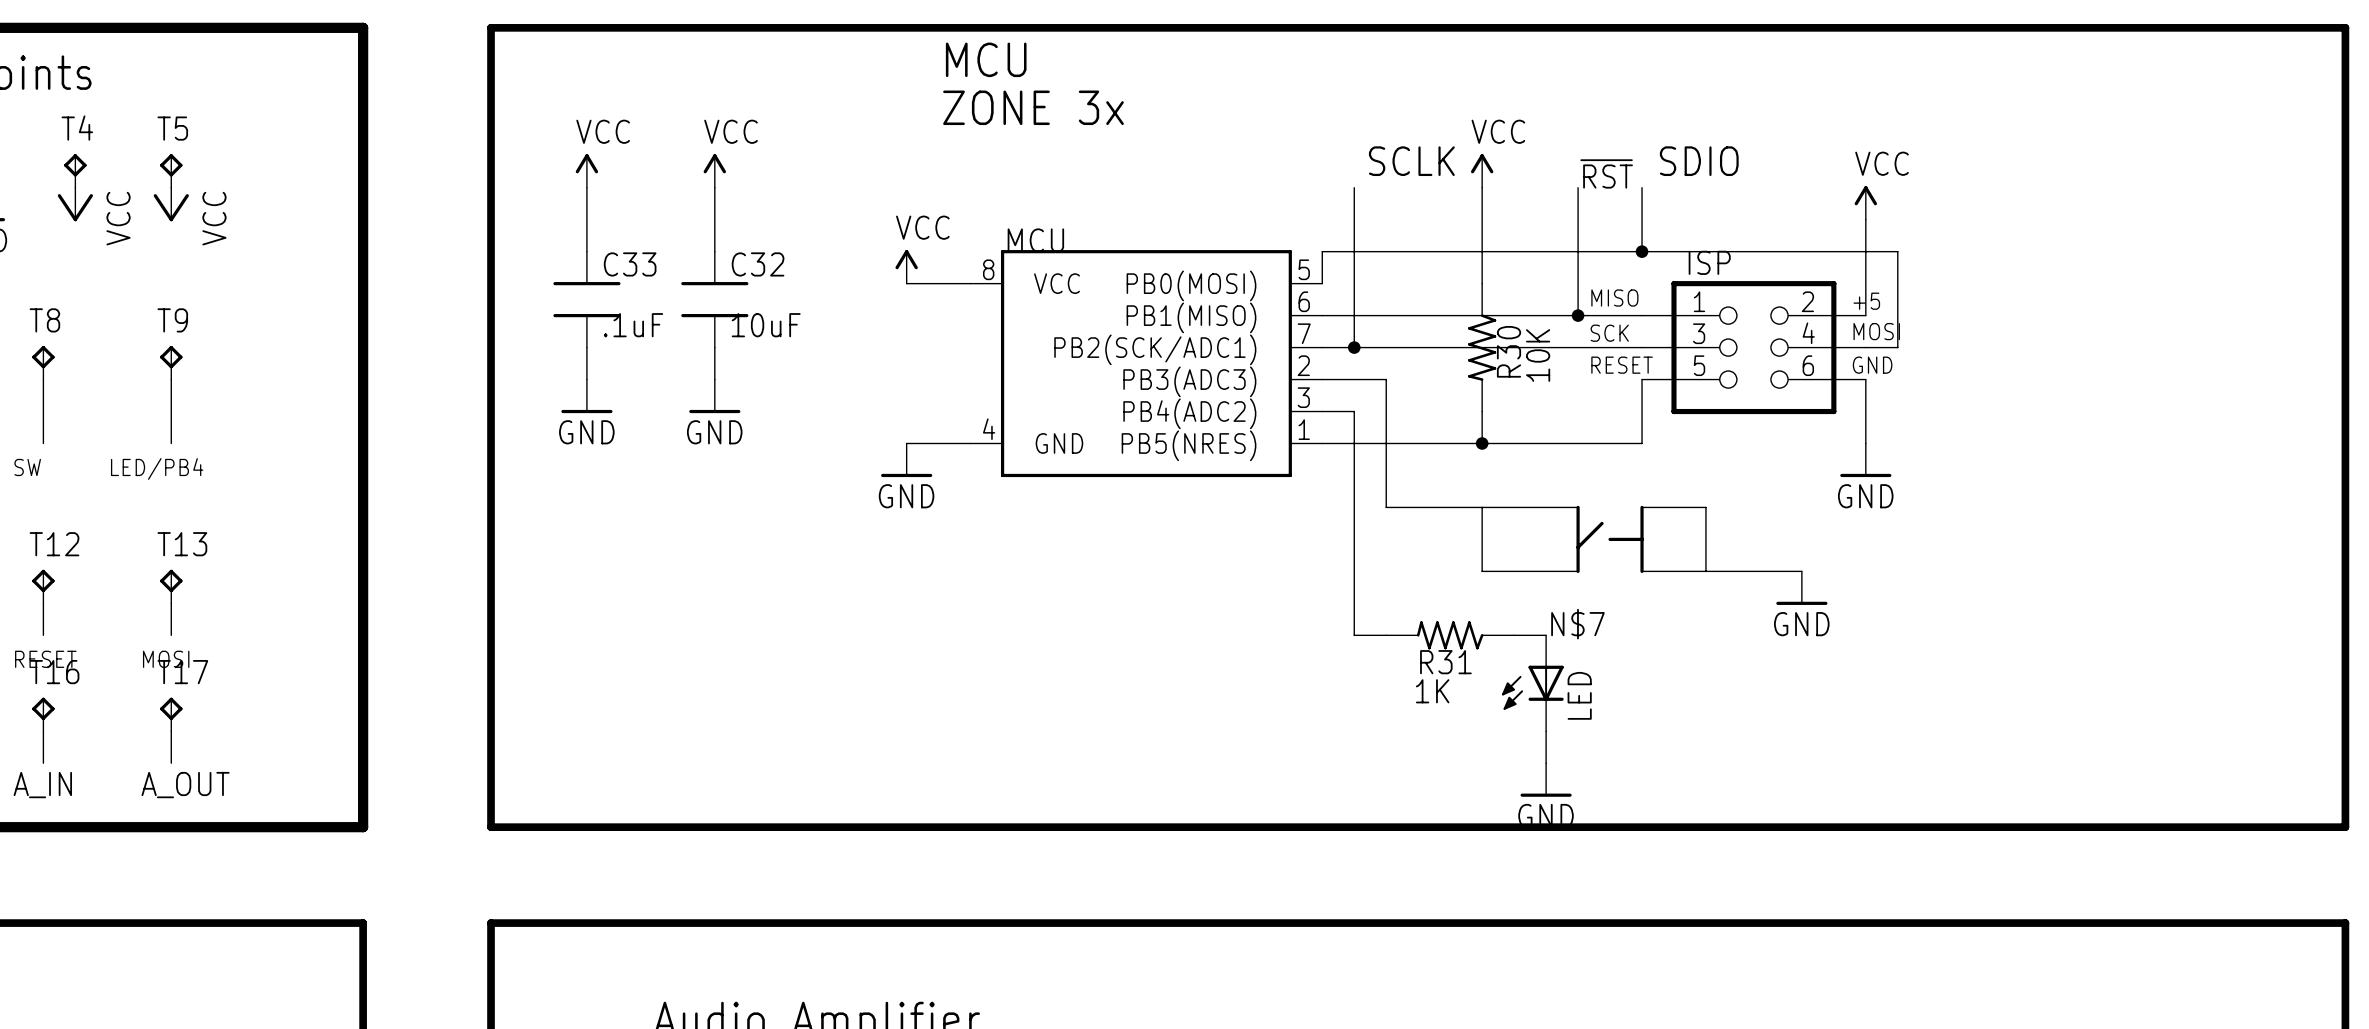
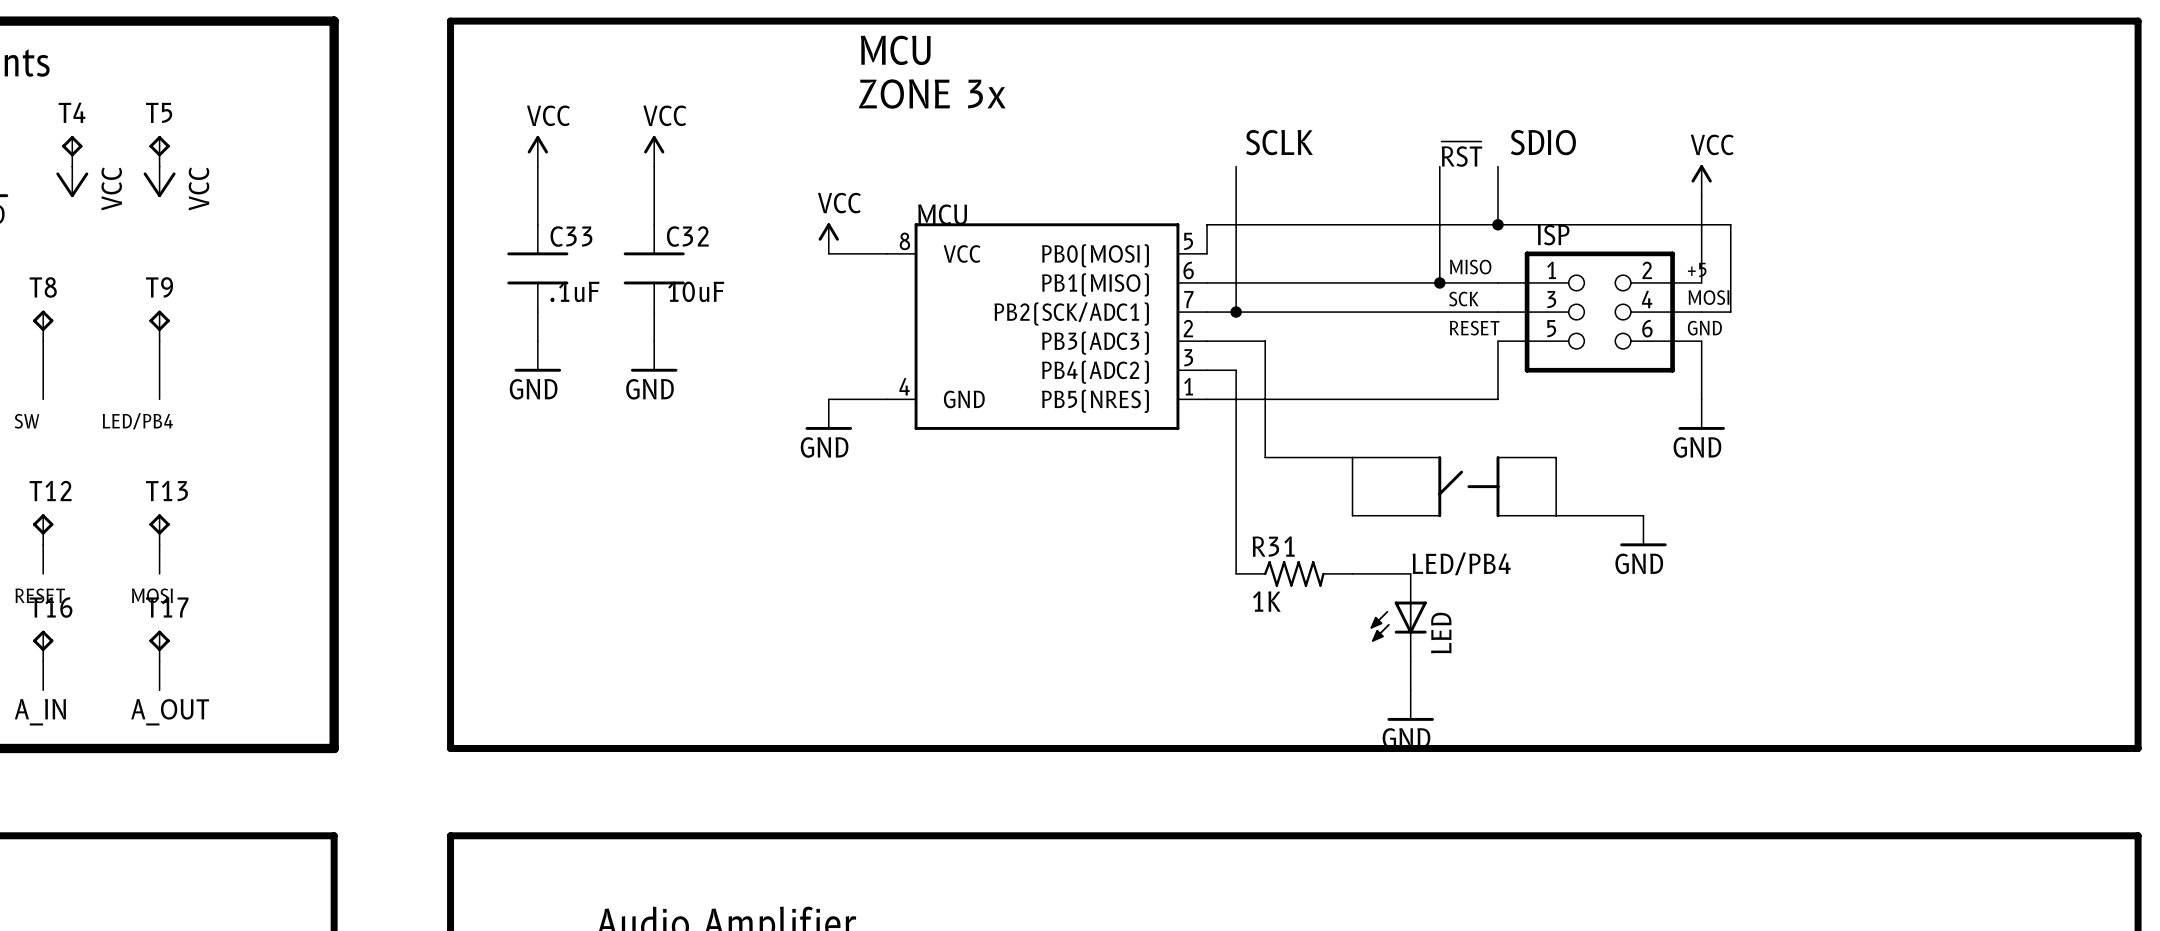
power symbol: VCC (1482, 170) -> none
wire: (1482, 187) (1482, 283) -> none
R30: 10K (1482, 347) -> none
wire: (1482, 411) (1482, 443) -> none
junction: (1482, 443) -> none
label: N$7 (1577, 624) -> LED/PB4 (1461, 563)
R31 rotation: 0° (1450, 635) -> 180° (1294, 573)
R31 value position: 1K (1432, 691) -> 1K (1266, 601)

